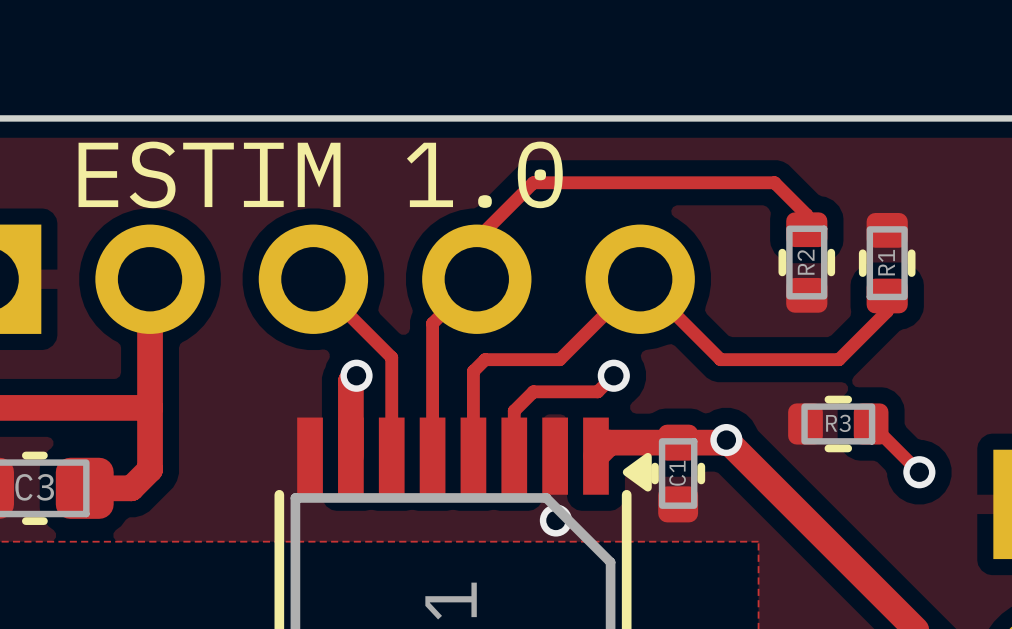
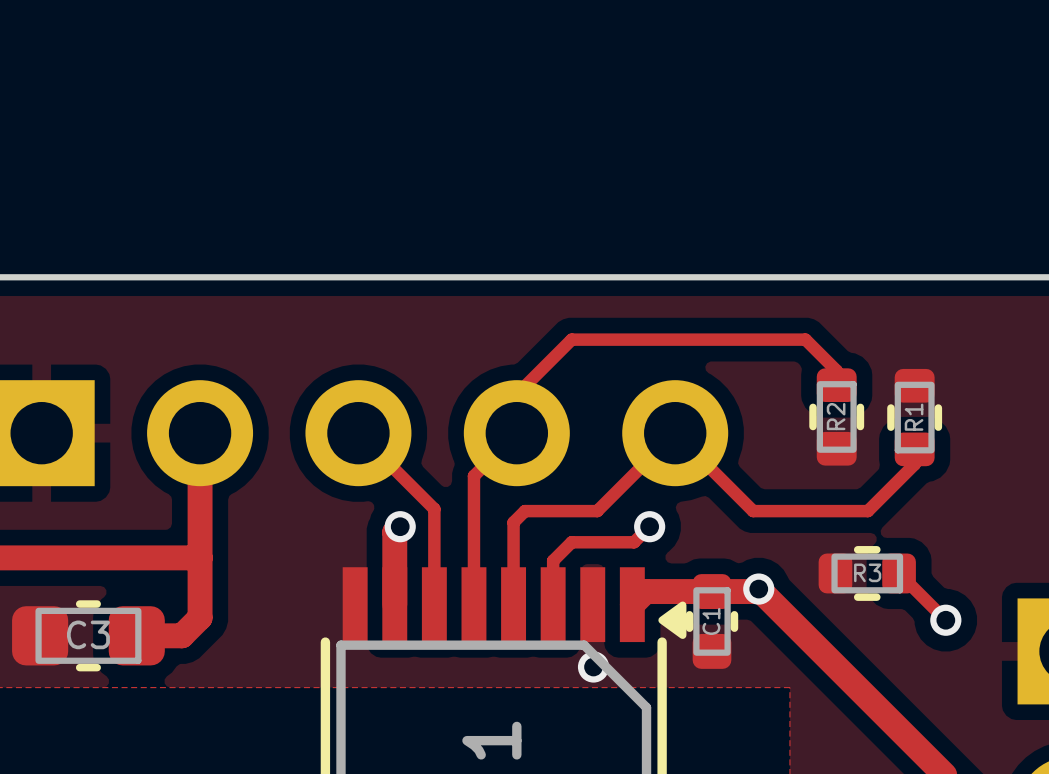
text: ESTIM 1.0 (320, 174) -> none

